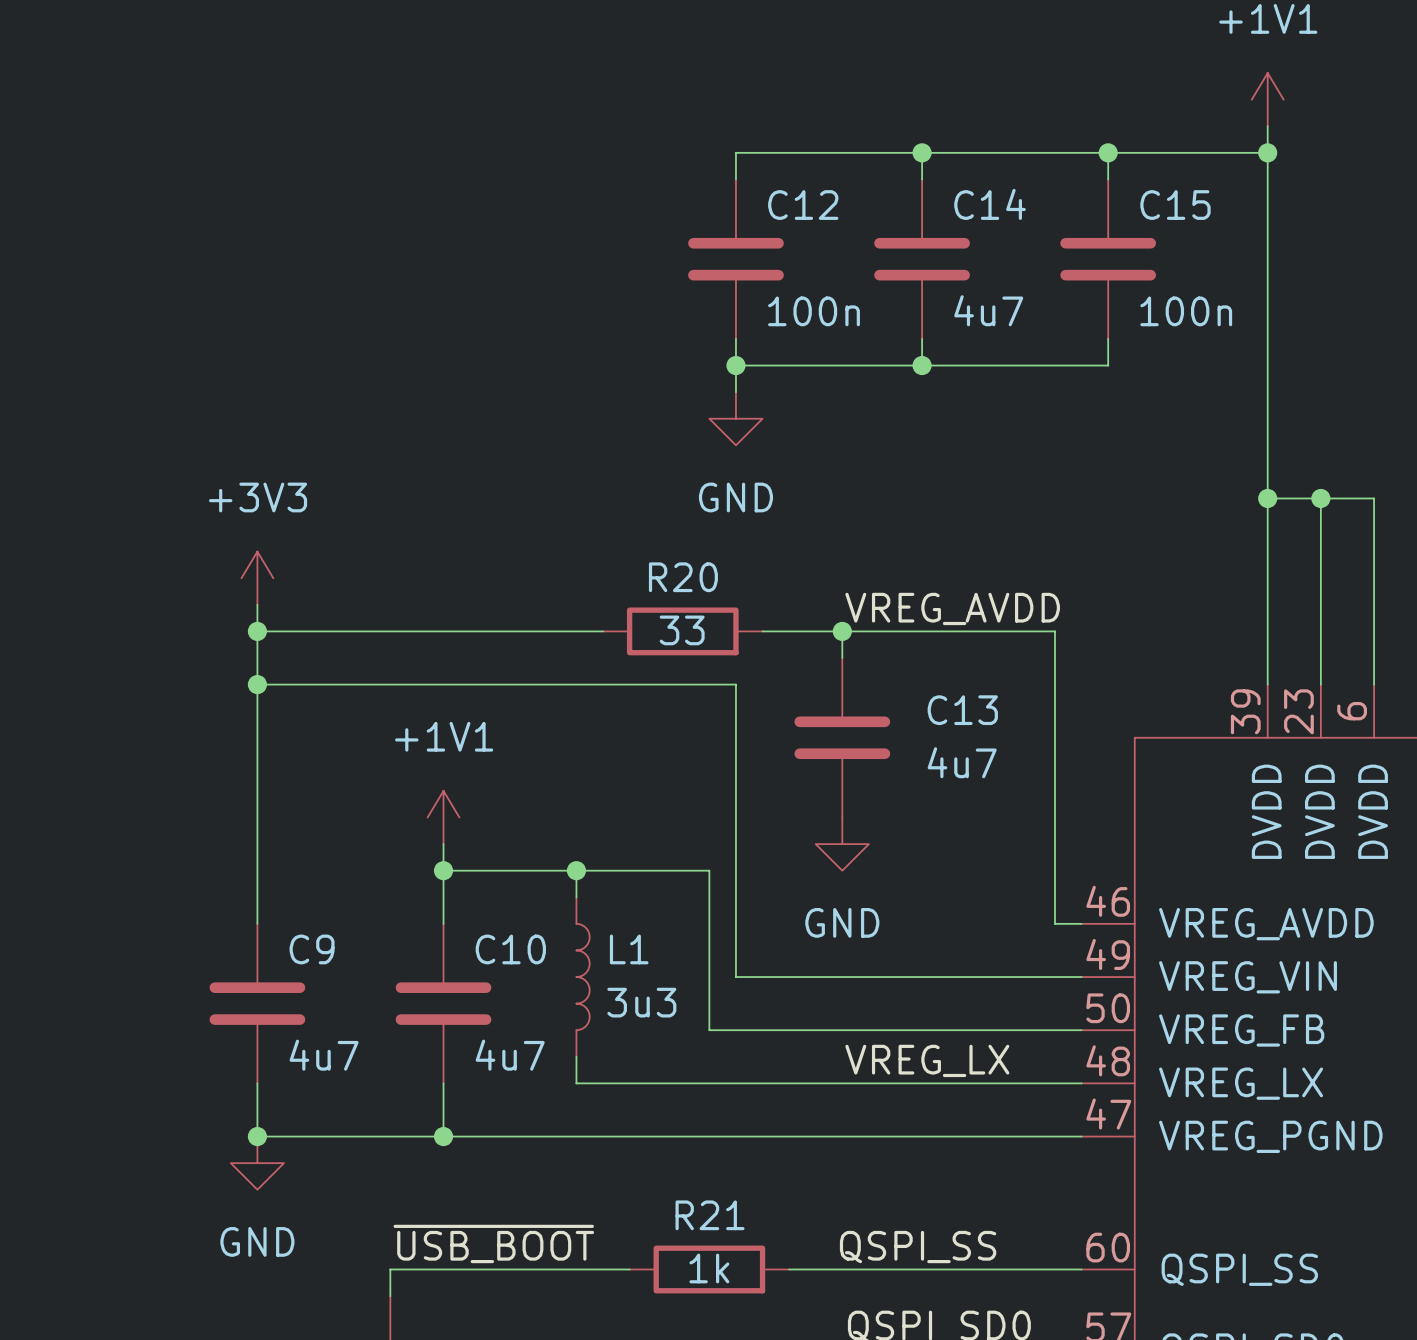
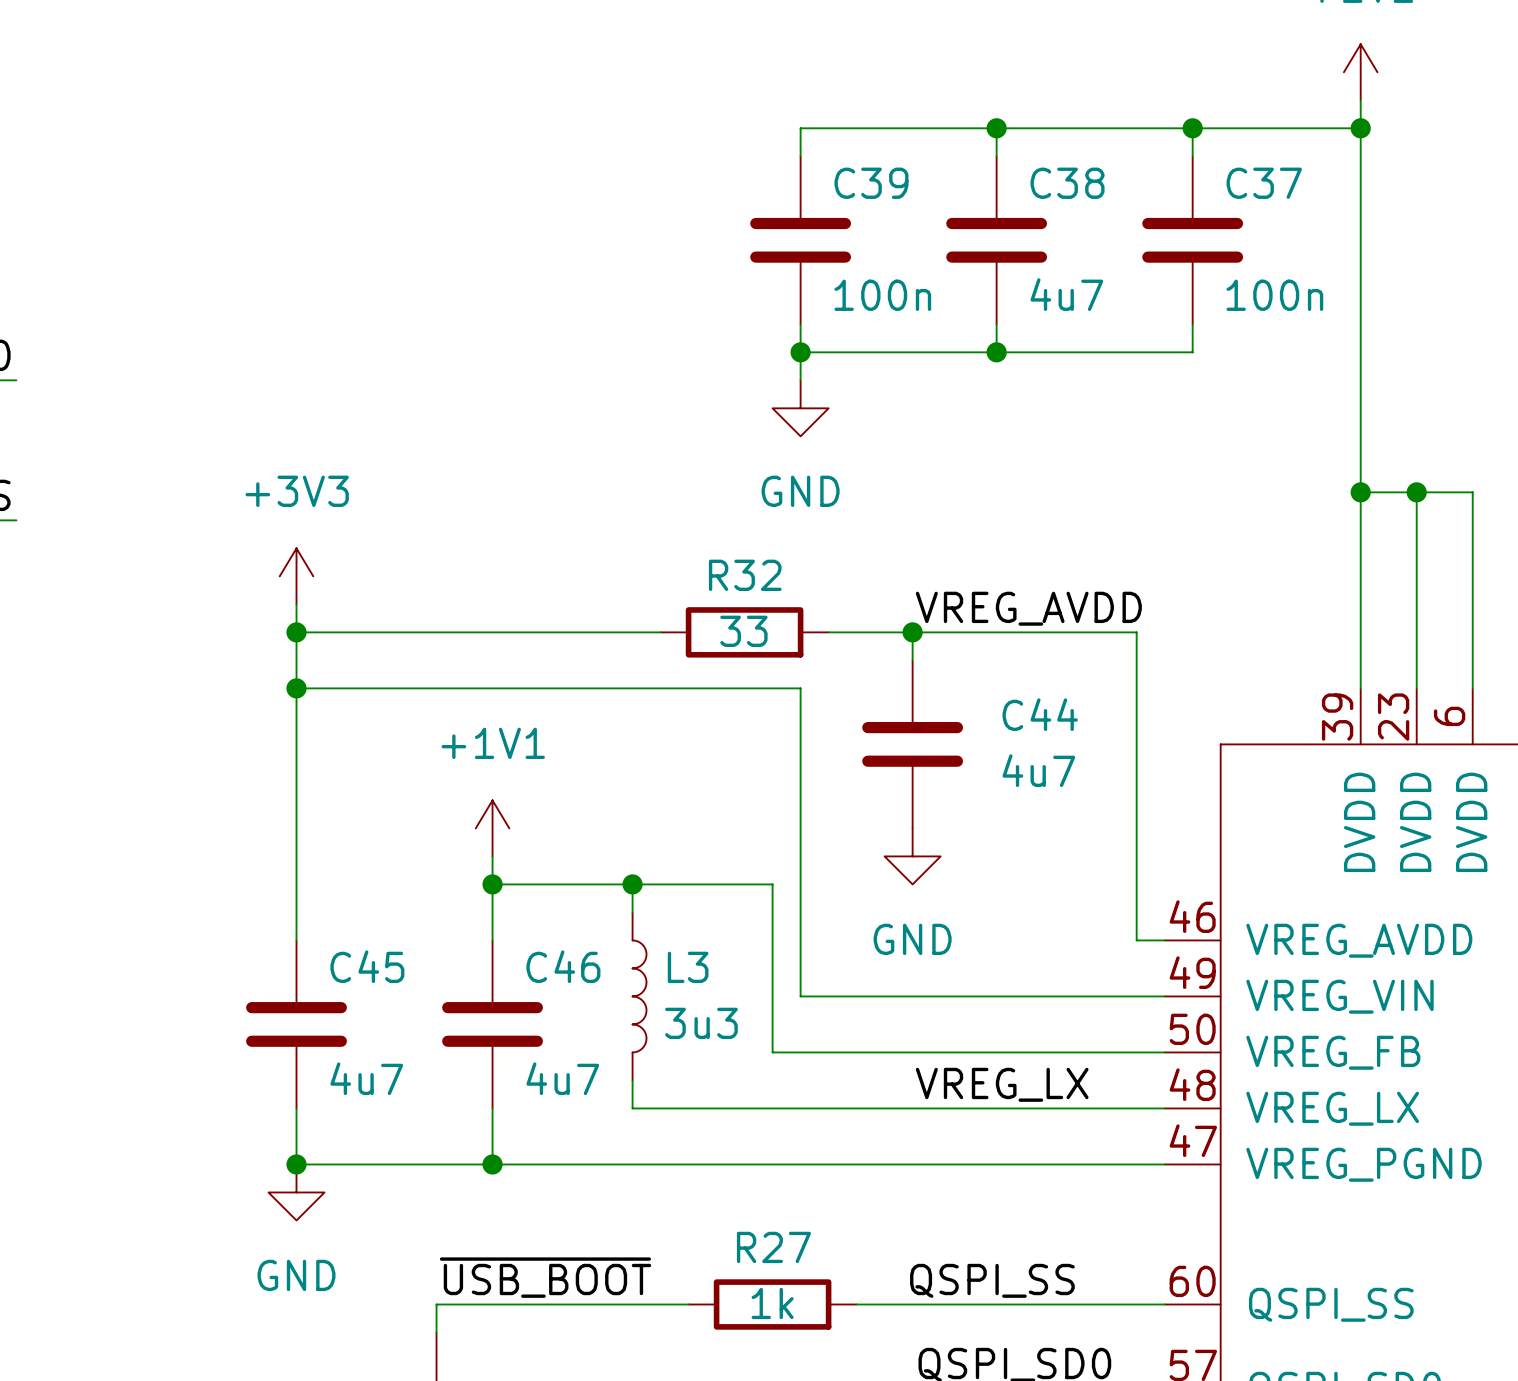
C14 name: C14 (990, 204) -> C38 (1067, 183)
C12 name: C12 (803, 205) -> C39 (871, 183)
C15 name: C15 (1175, 205) -> C37 (1264, 183)
R20 name: R20 (683, 577) -> R32 (745, 575)
C13 name: C13 (962, 710) -> C44 (1040, 714)
C9 name: C9 (312, 949) -> C45 (367, 966)
C10 name: C10 (510, 949) -> C46 (563, 966)
L1 name: L1 (629, 949) -> L3 (688, 967)
R21 name: R21 (710, 1215) -> R27 (773, 1247)

